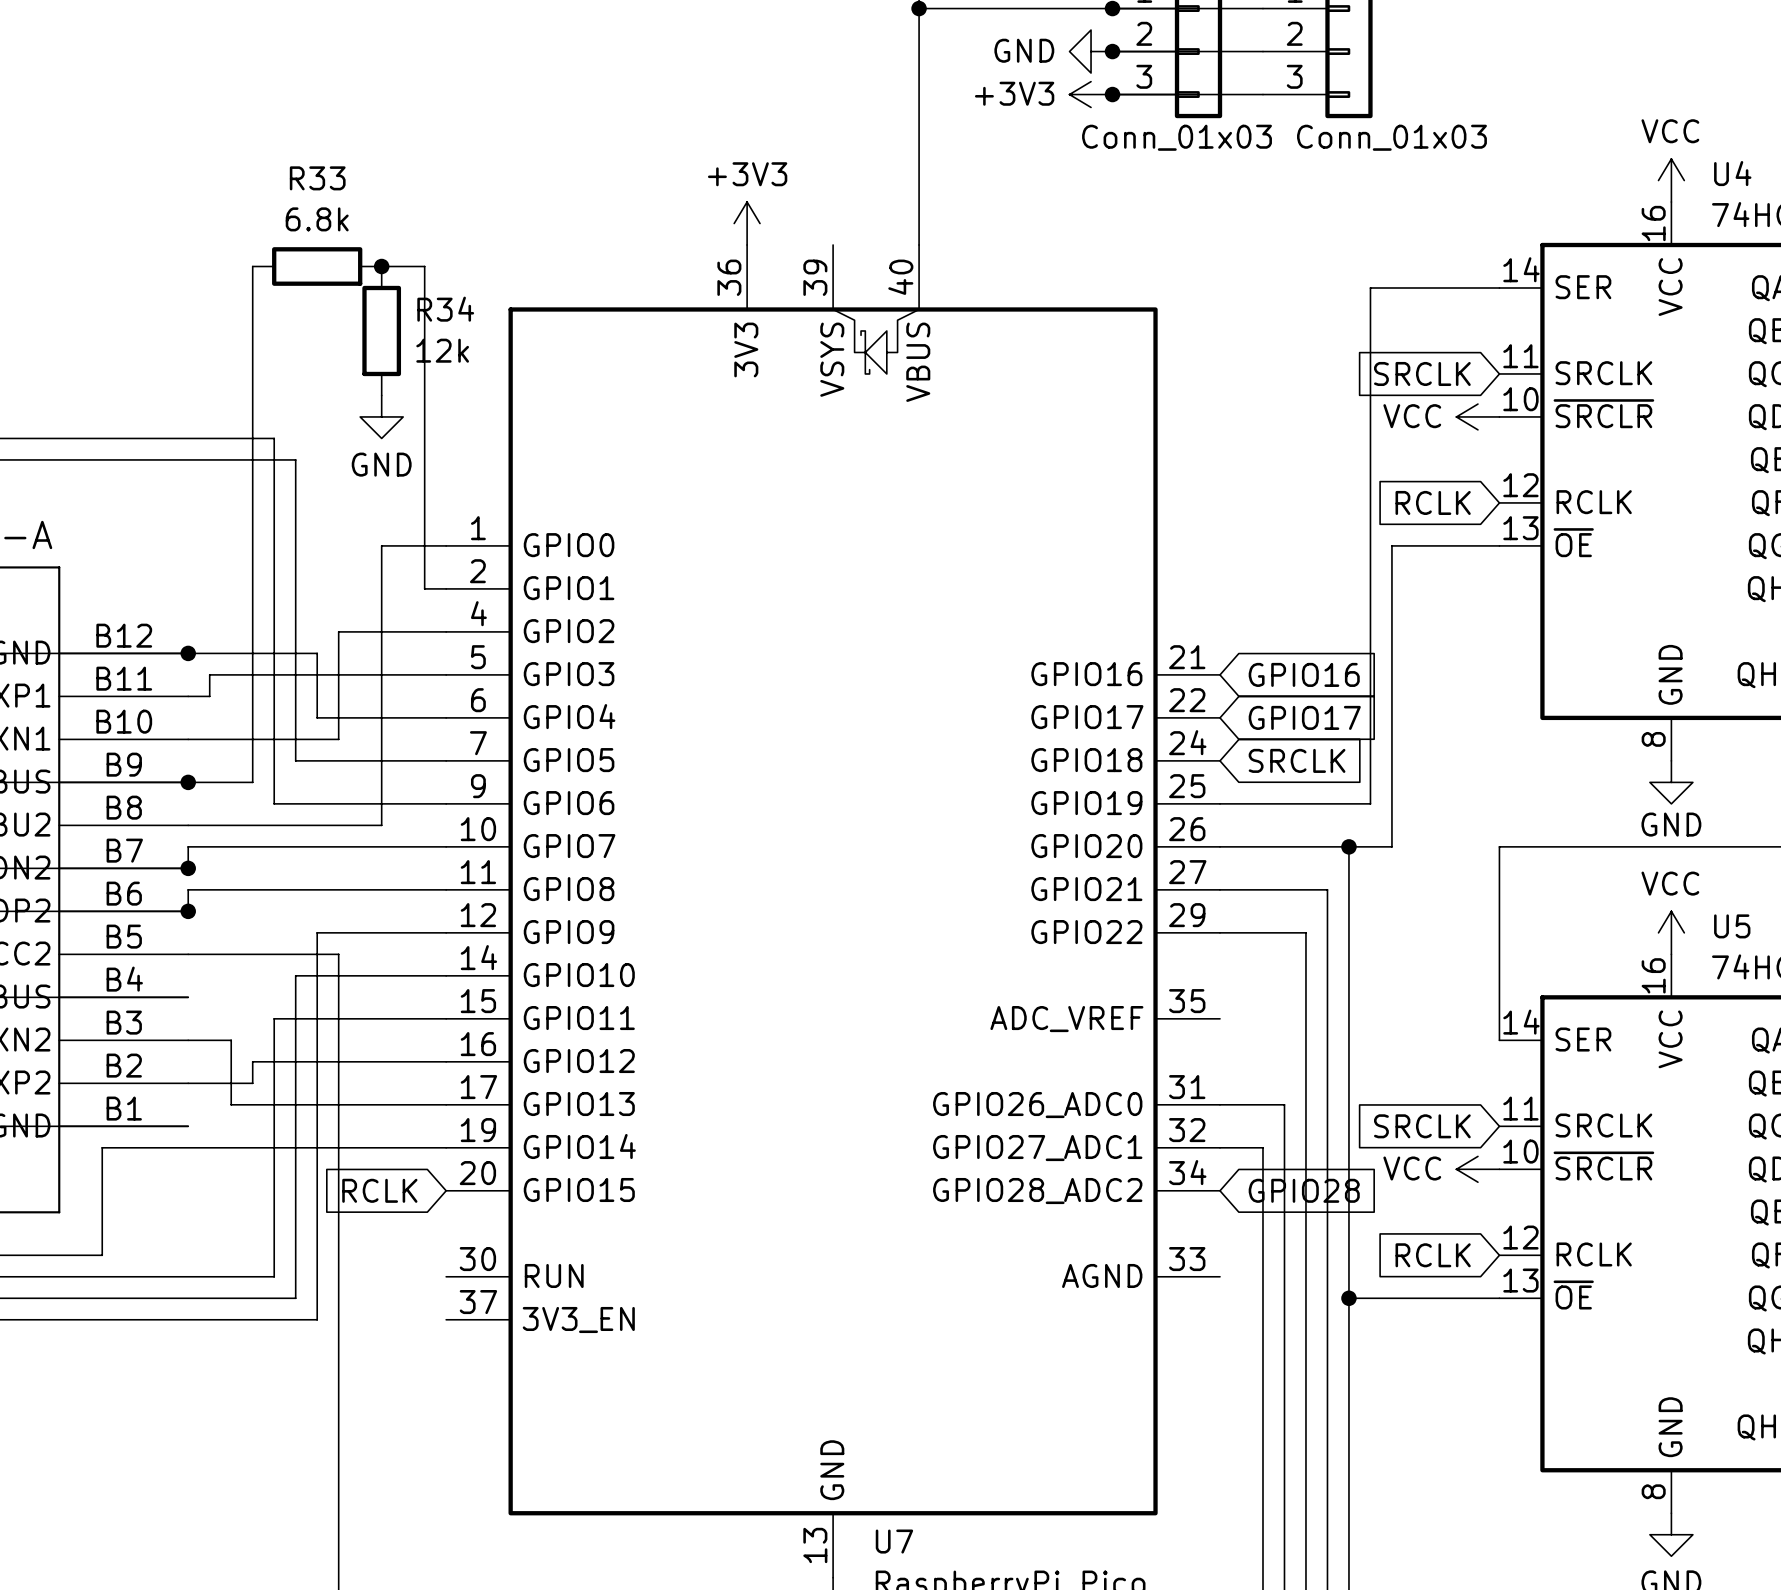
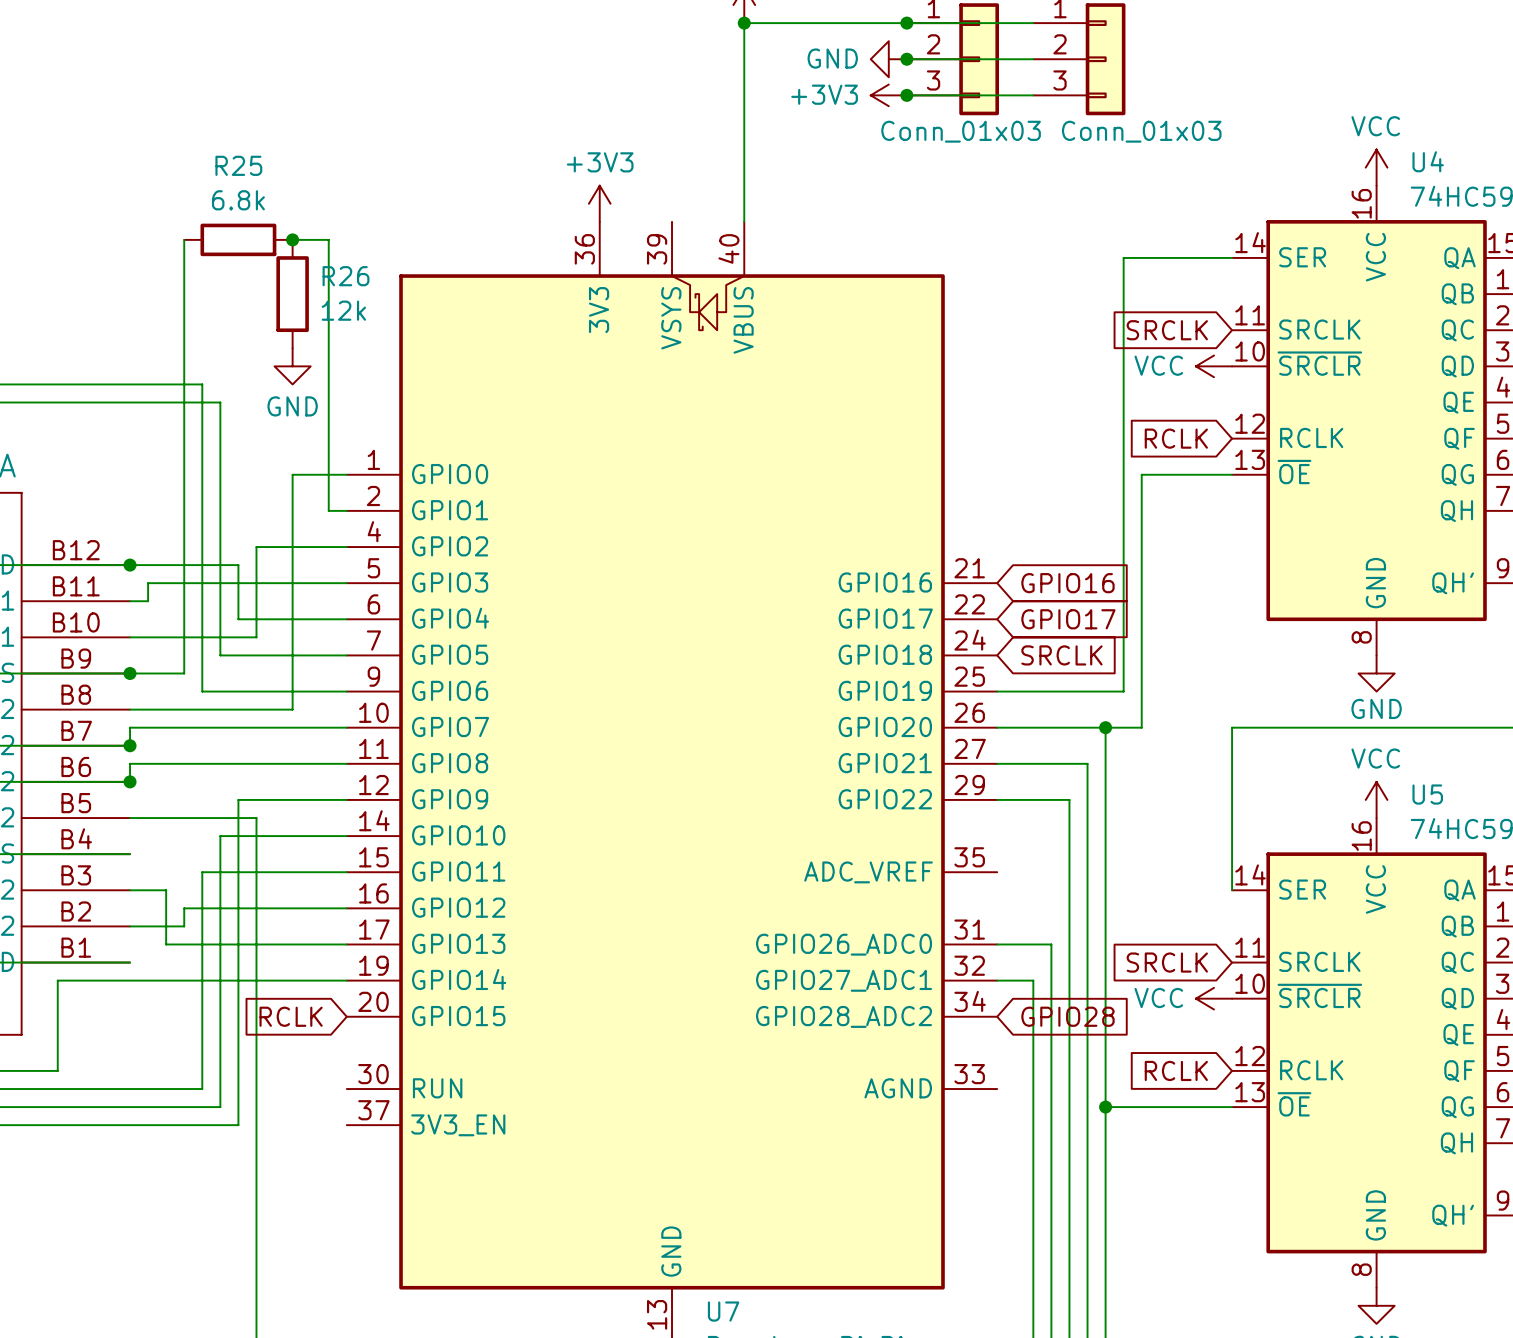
R33 name: R33 (317, 178) -> R25 (238, 165)
R34 name: R34 (445, 309) -> R26 (346, 276)

